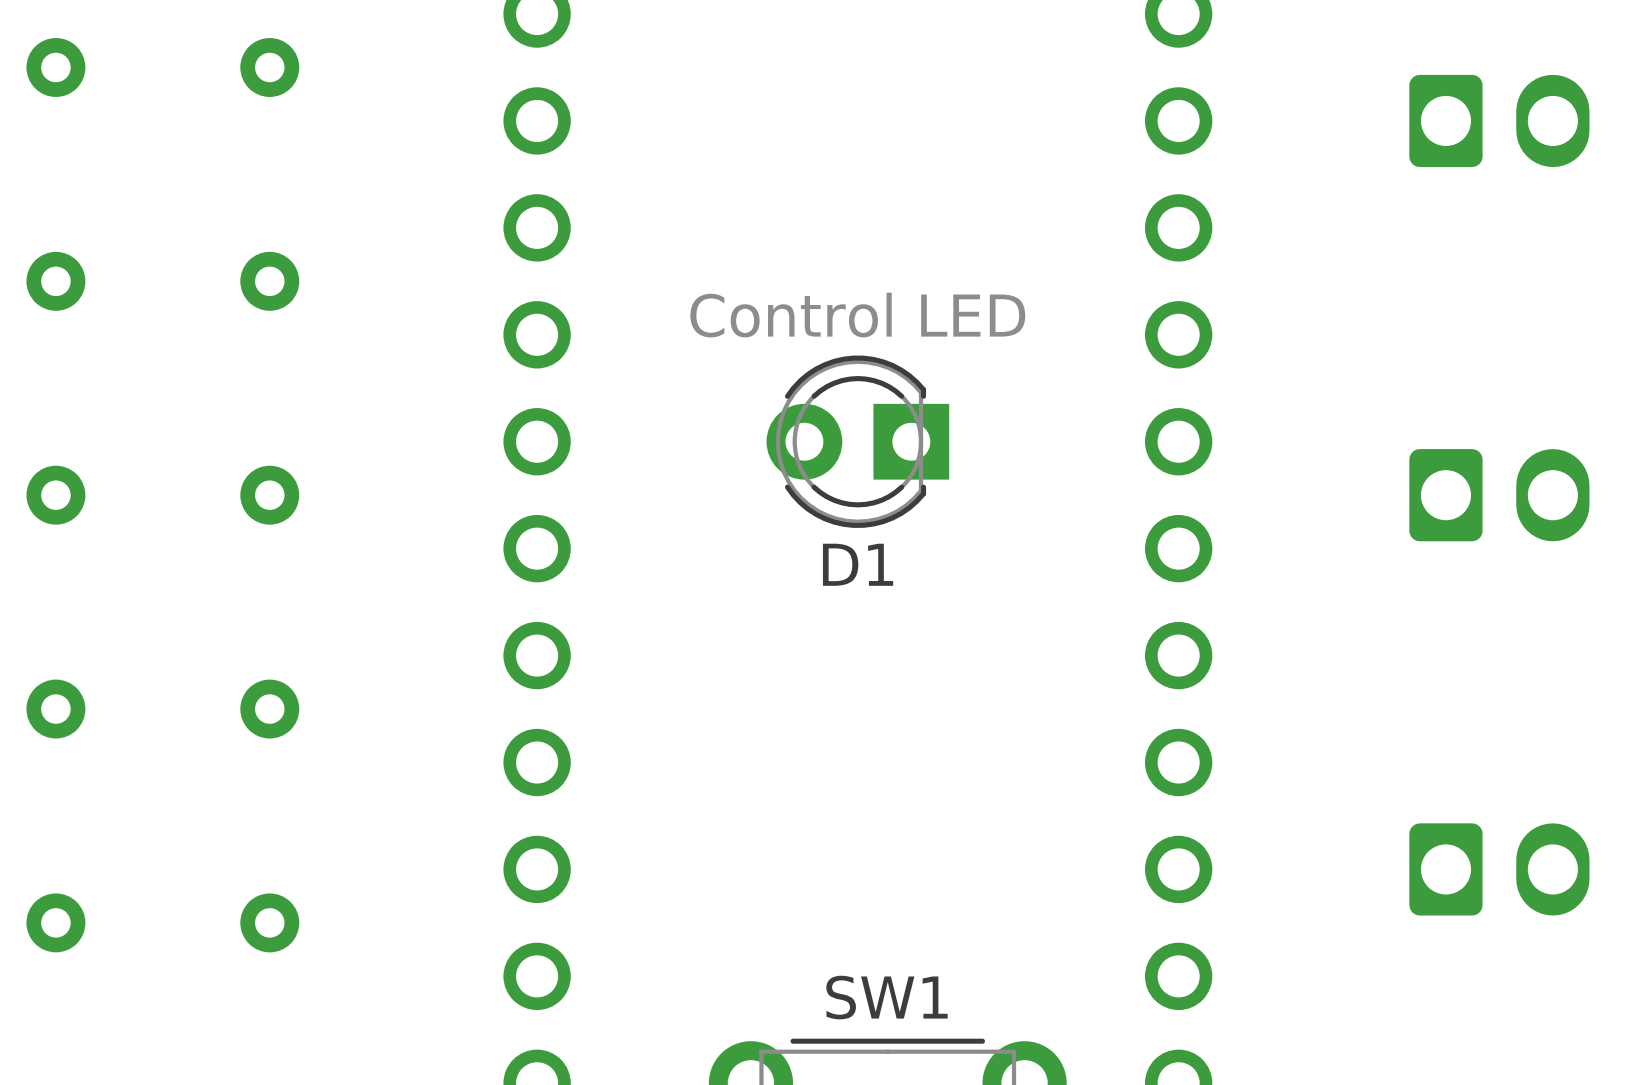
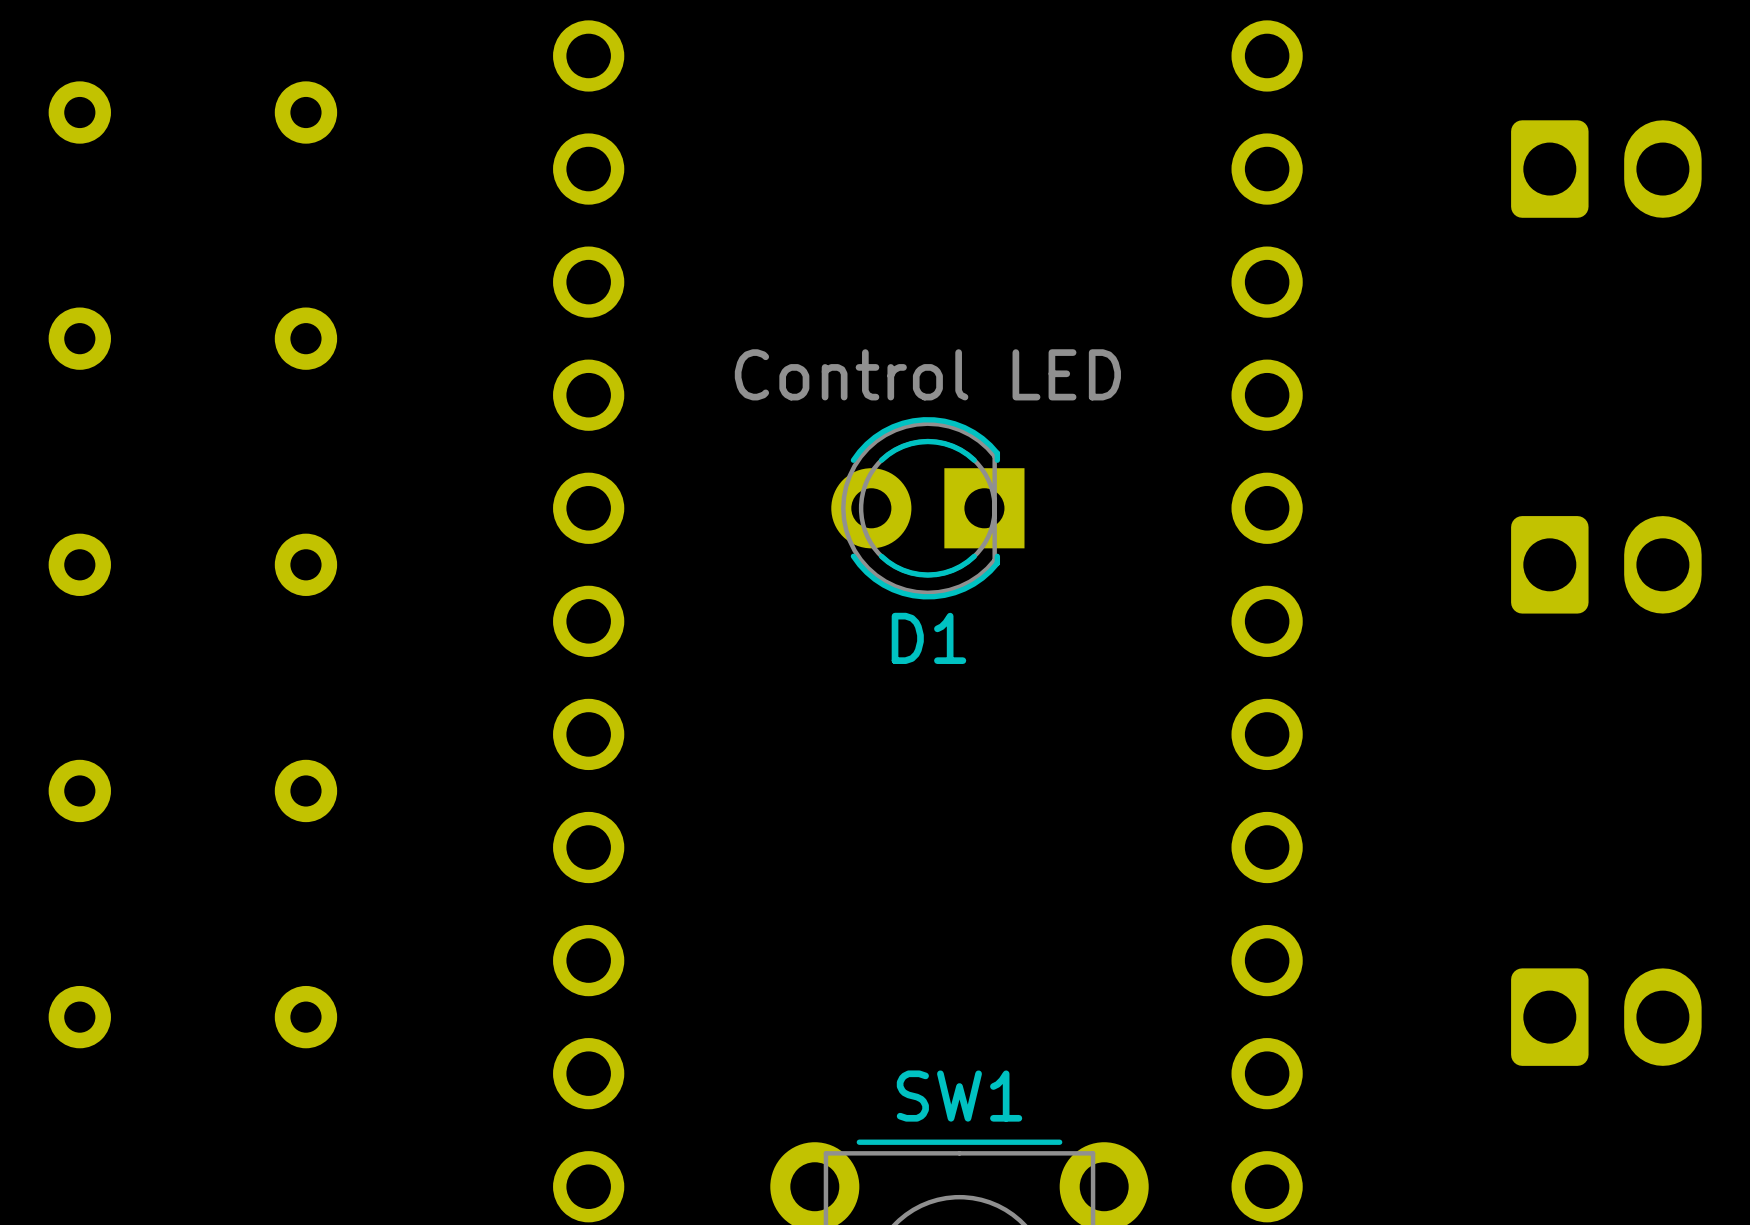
part position: (1499, 869) -> (1606, 1017)

